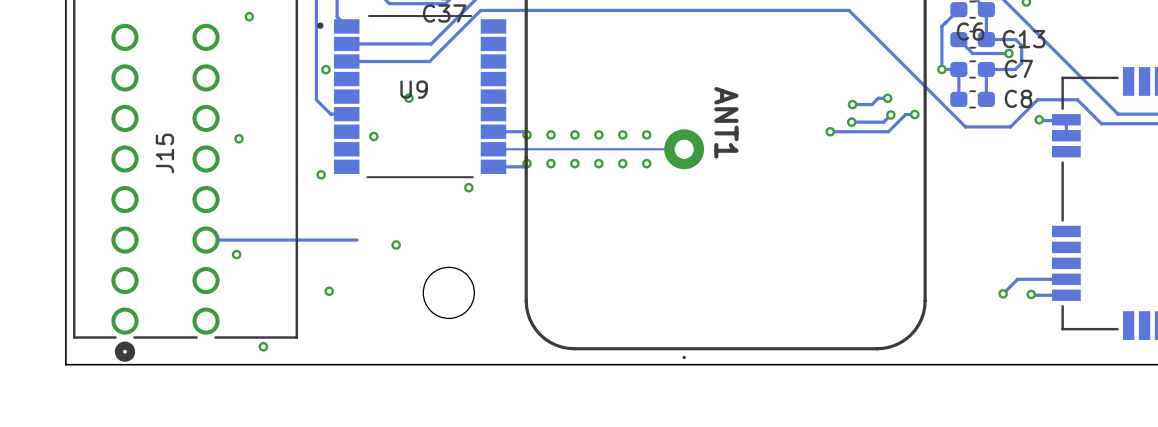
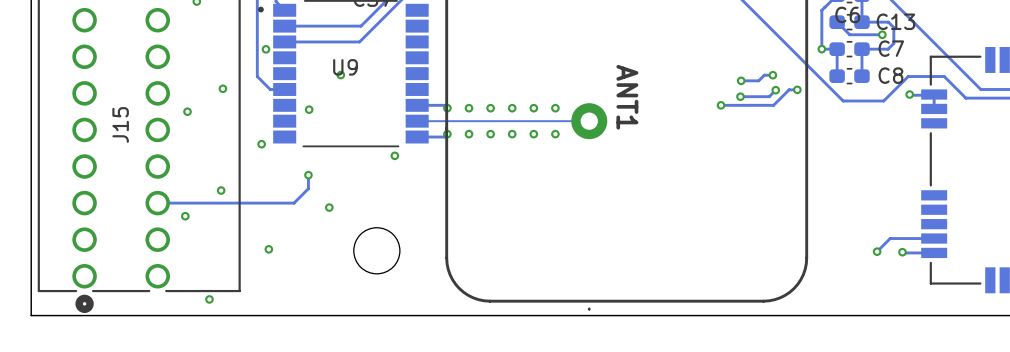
via: none -> (222, 88)
track: none -> (308, 175) (308, 188) (294, 203)
via: none -> (308, 175)
via: none -> (221, 190)

